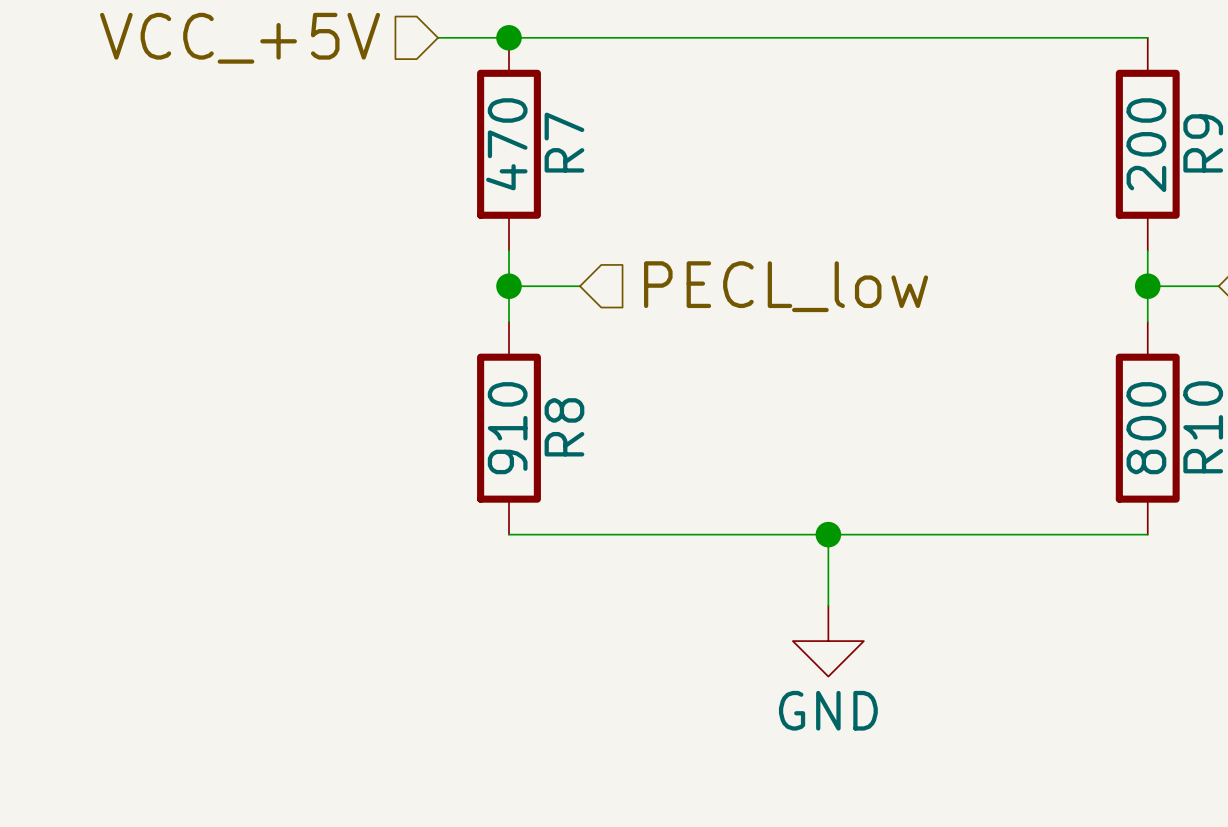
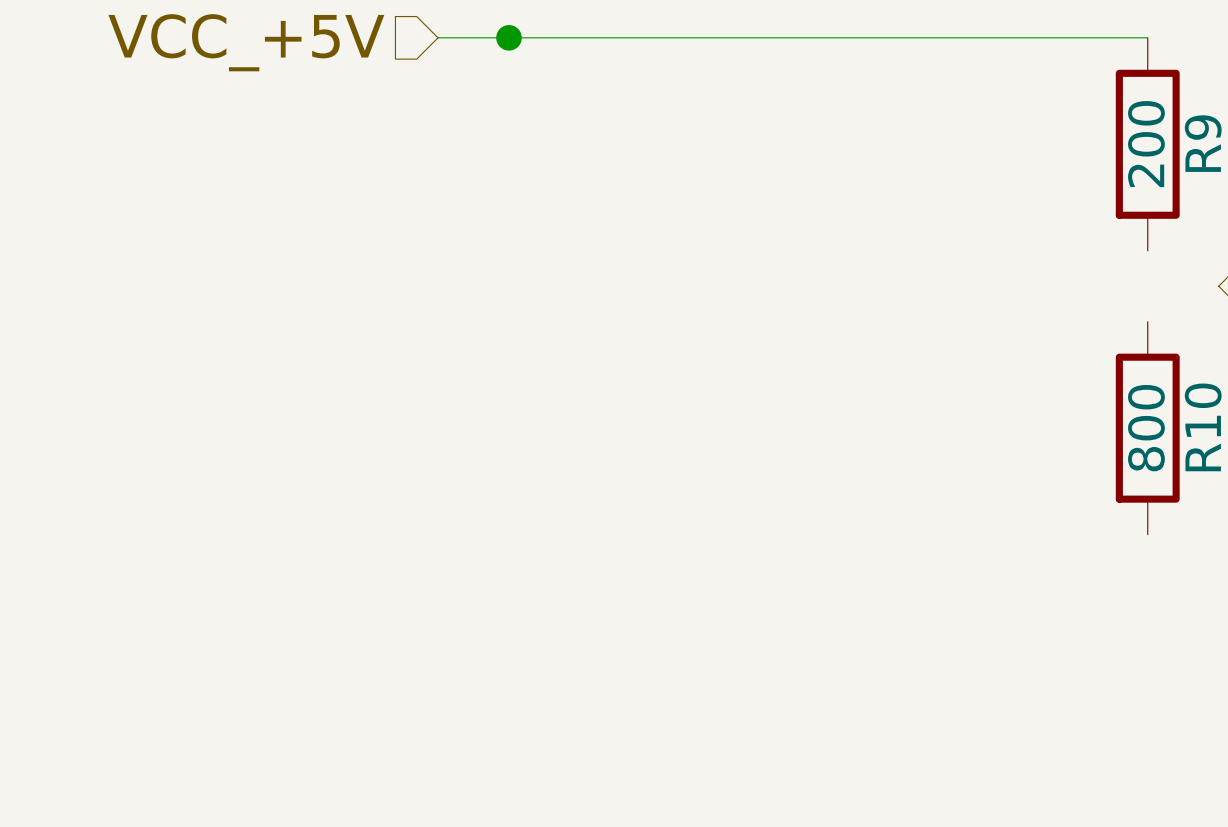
R7: 470 (509, 144) -> none
wire: (509, 250) (509, 321) -> none
wire: (1147, 250) (1147, 321) -> none
wire: (509, 286) (579, 286) -> none
junction: (509, 286) -> none
hierarchical label: PECL_low (786, 286) -> none
wire: (1147, 286) (1218, 286) -> none
junction: (1147, 286) -> none
R8: 910 (509, 428) -> none
wire: (509, 534) (1147, 534) -> none
wire: (828, 534) (828, 605) -> none
junction: (828, 534) -> none
power symbol: GND (828, 641) -> none

